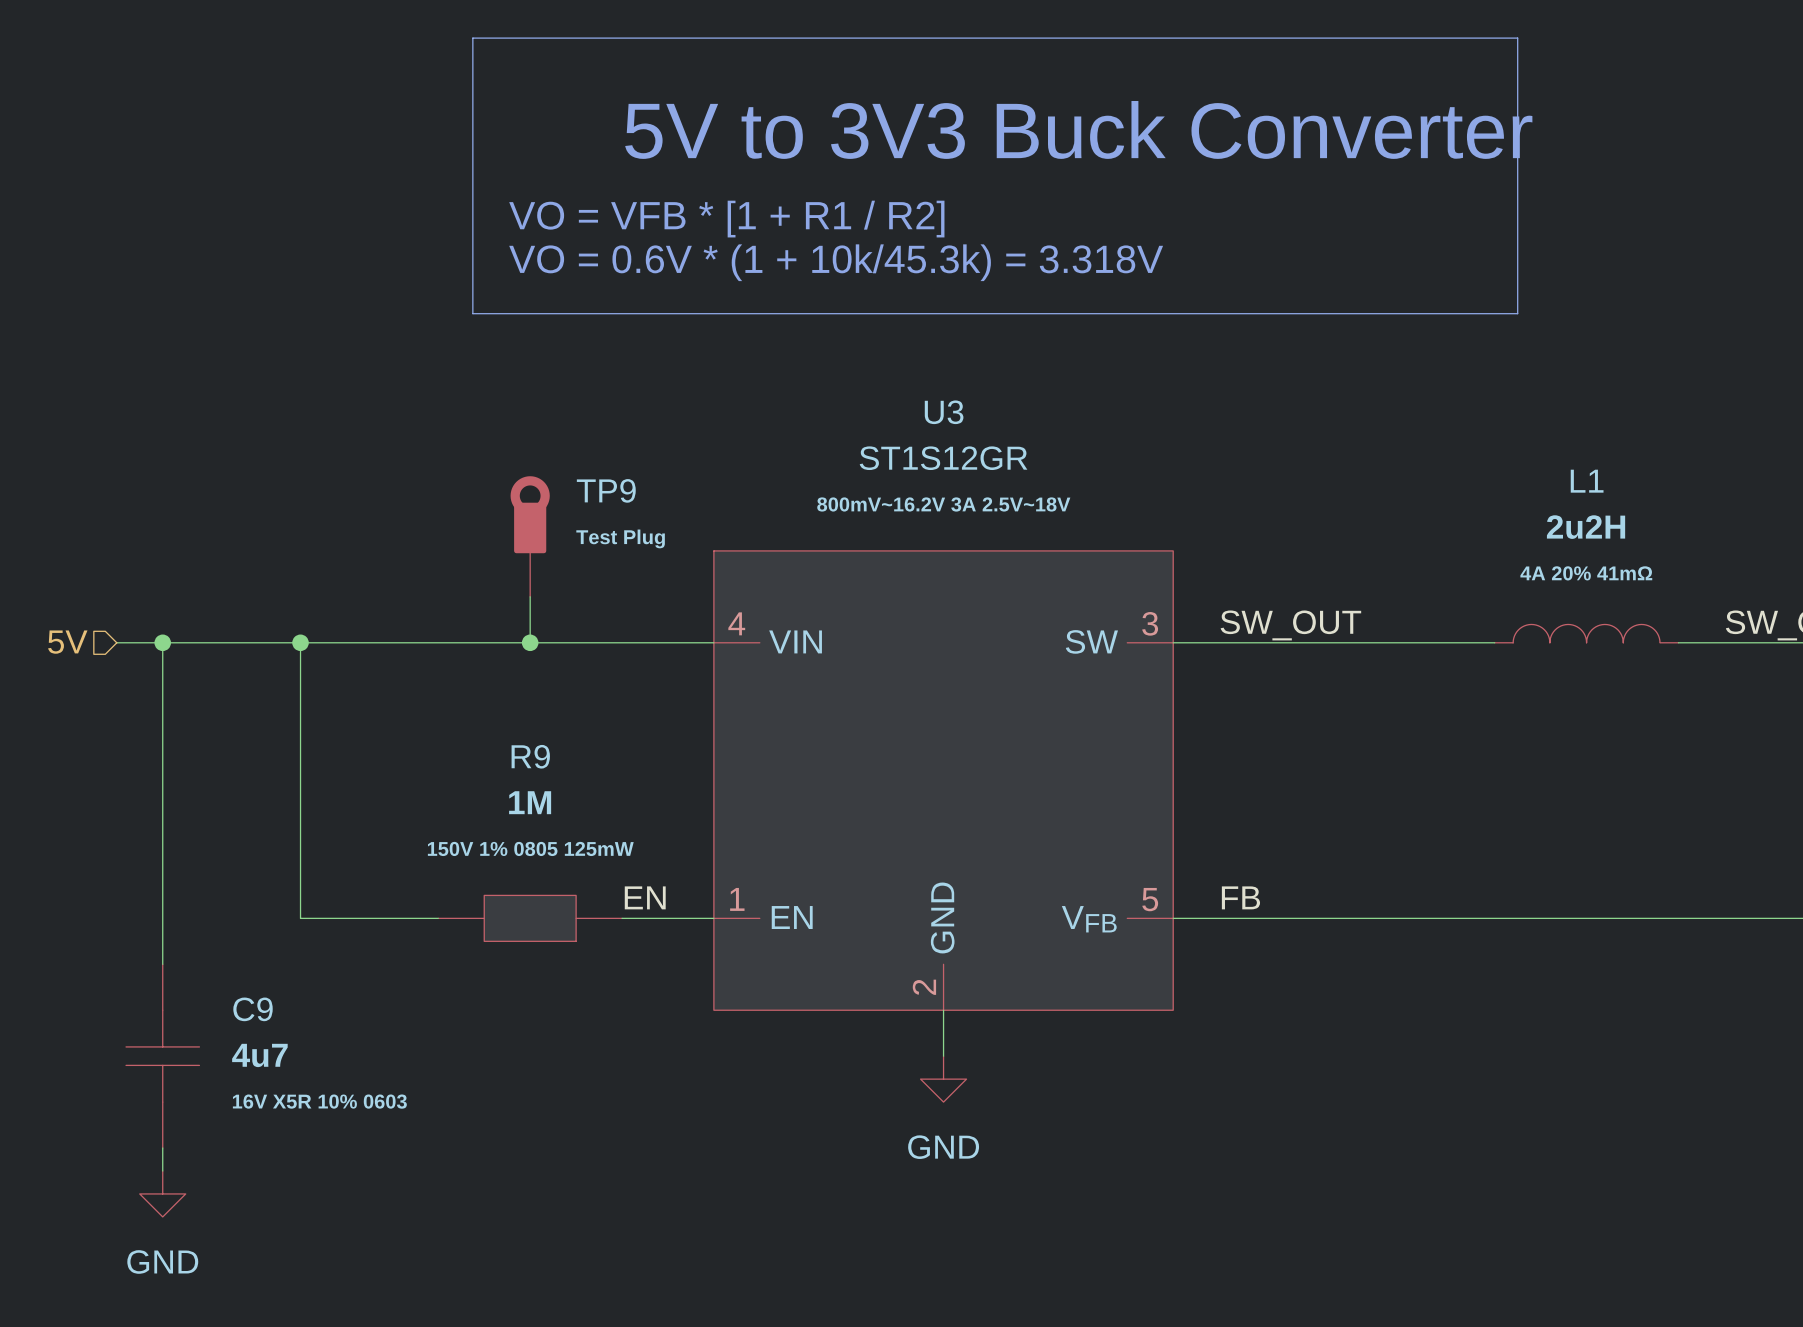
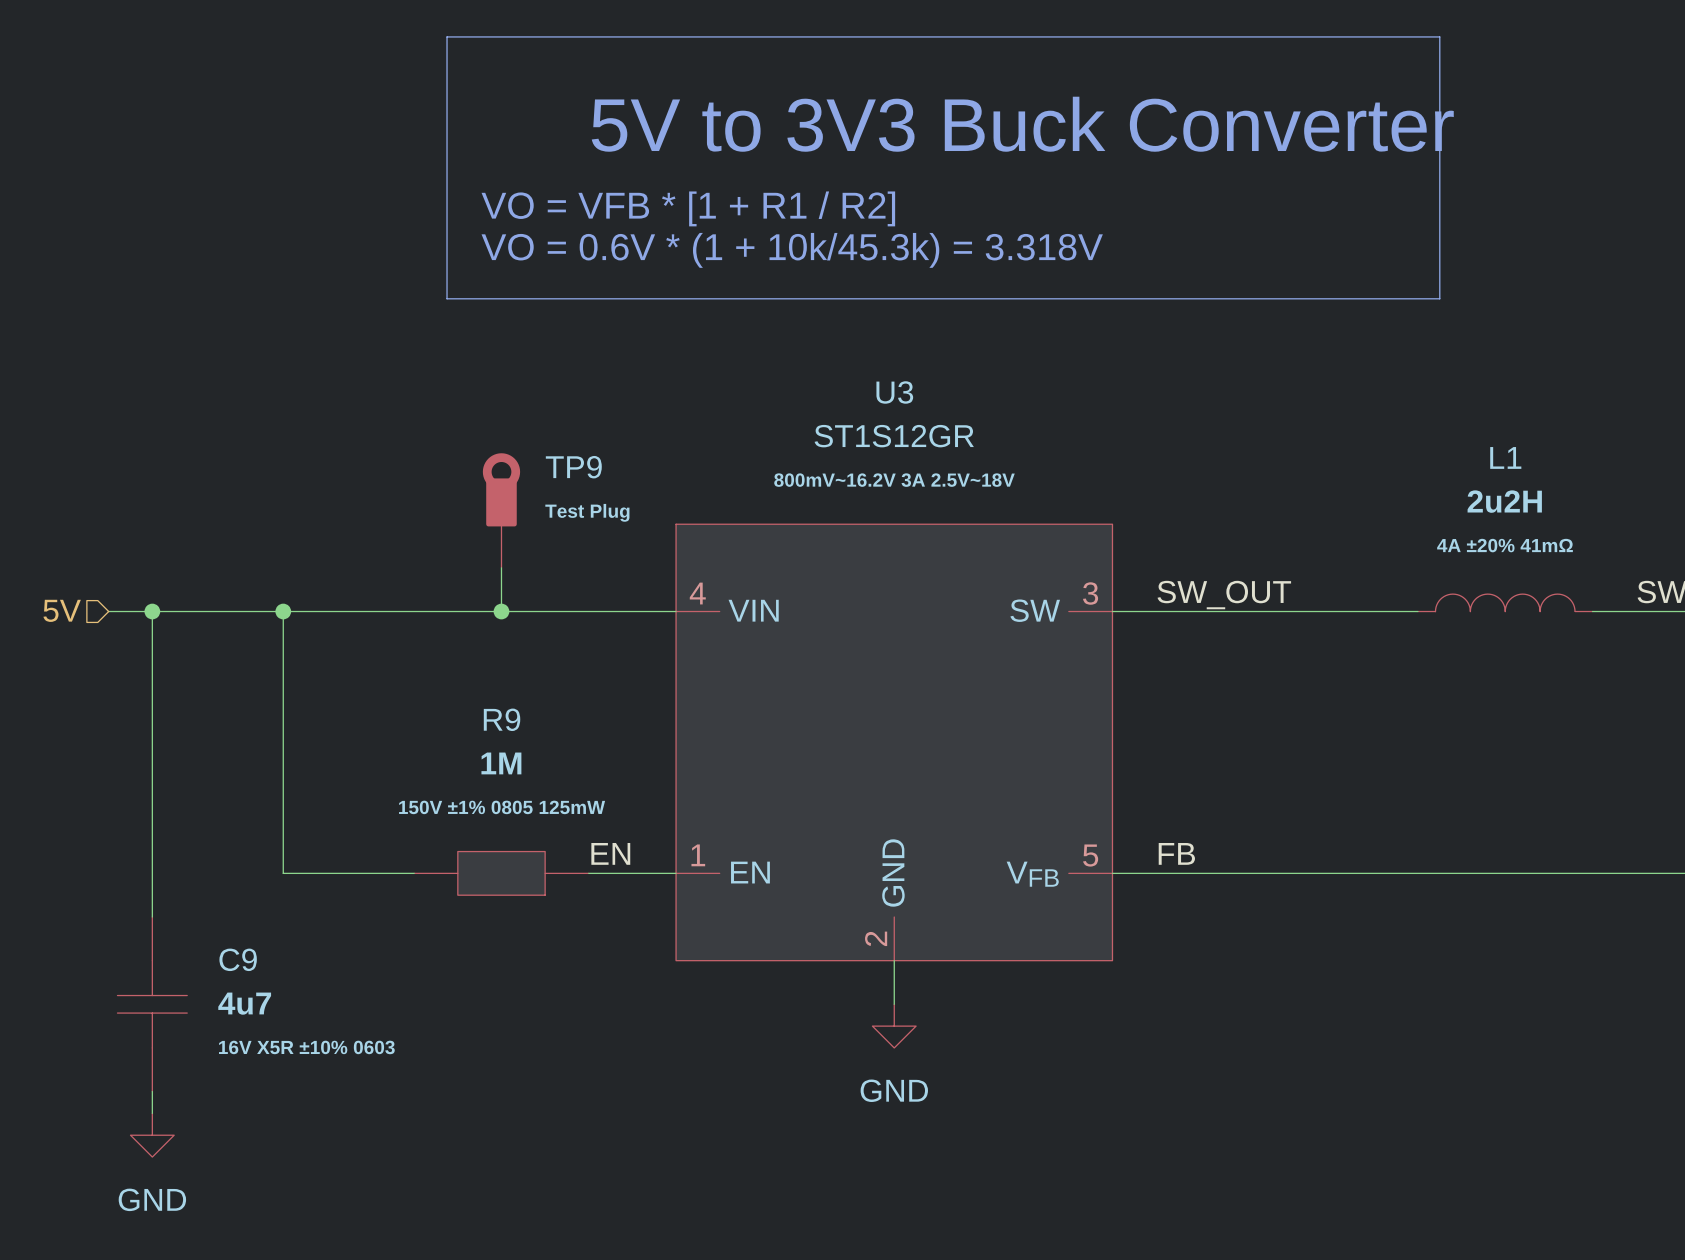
L1 text: 4A 20% 41mΩ (1586, 573) -> 4A ±20% 41mΩ (1505, 545)
R9 text: 150V 1% 0805 125mW (530, 848) -> 150V ±1% 0805 125mW (502, 807)
C9 text: 16V X5R 10% 0603 (319, 1101) -> 16V X5R ±10% 0603 (306, 1047)

